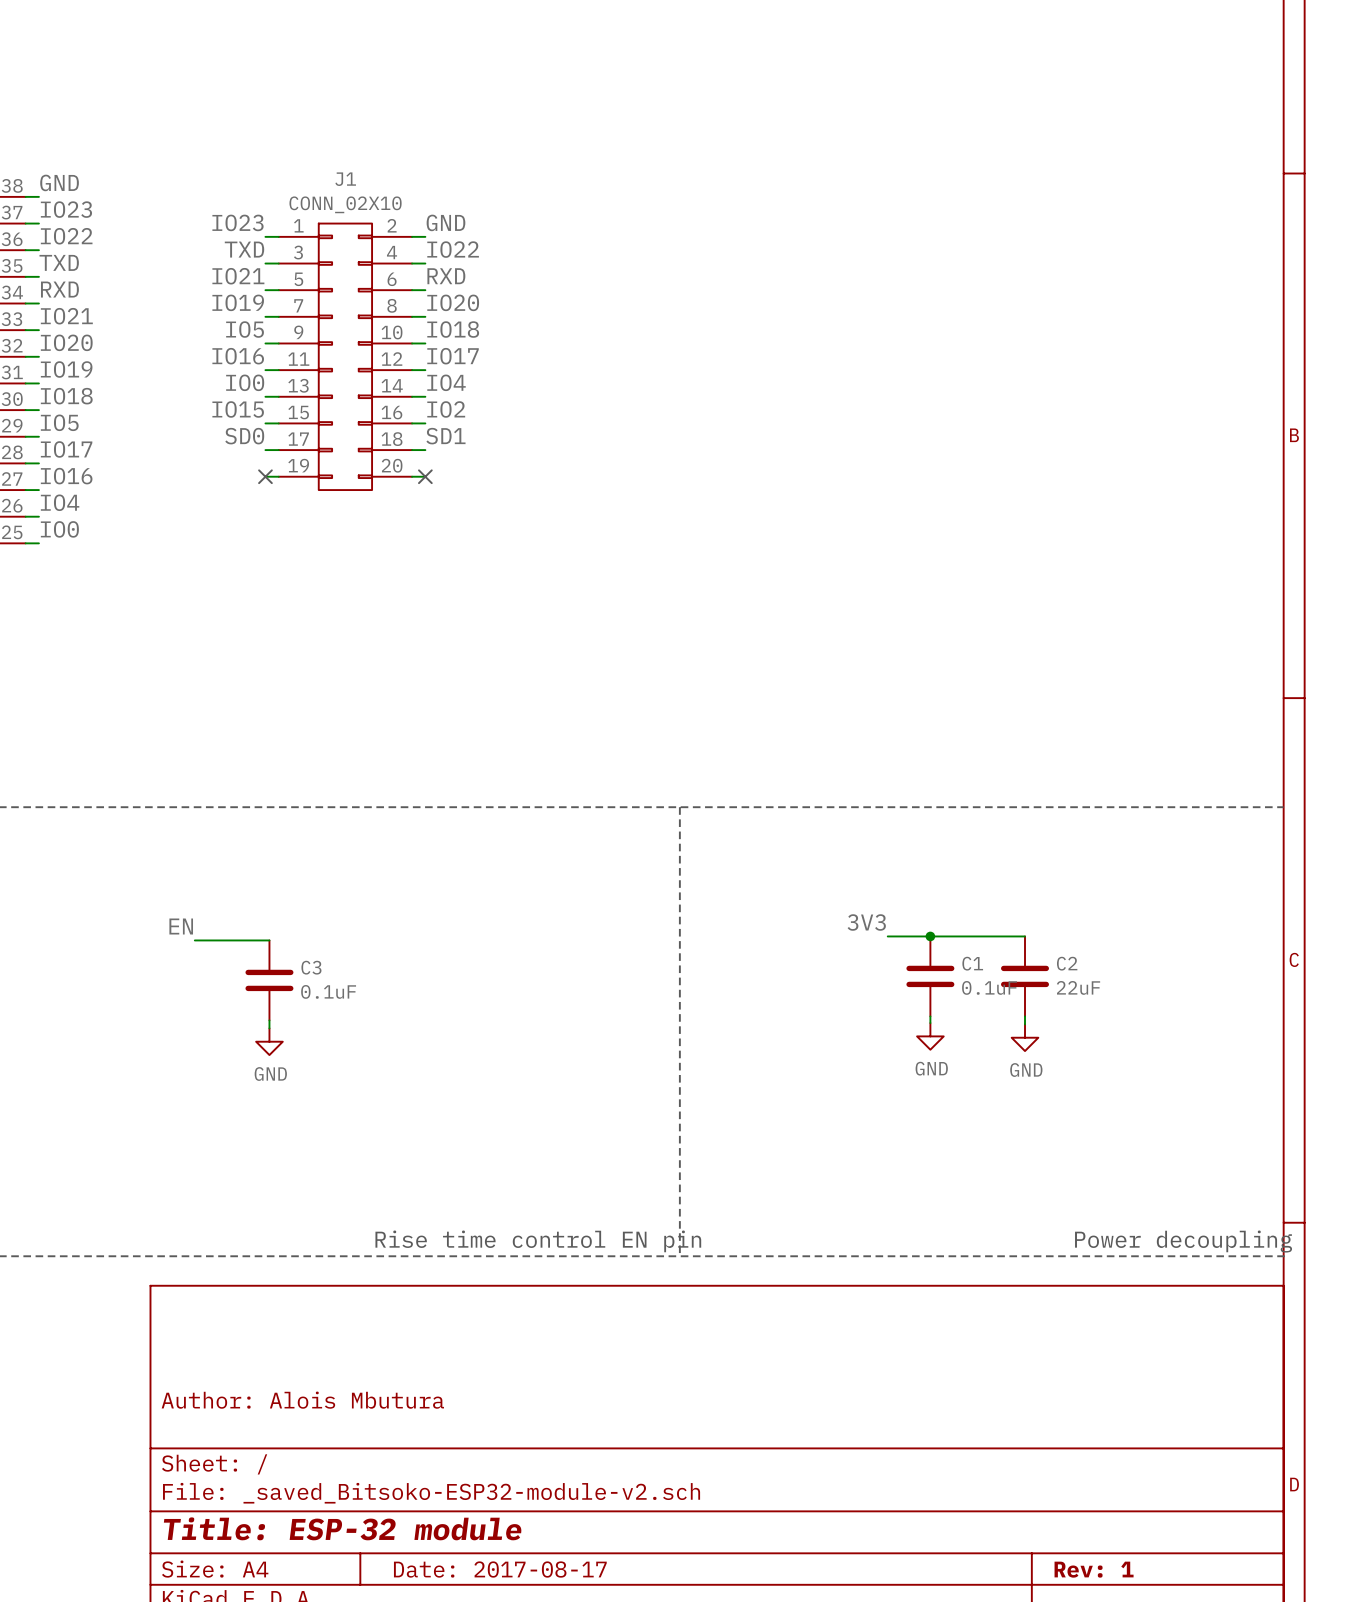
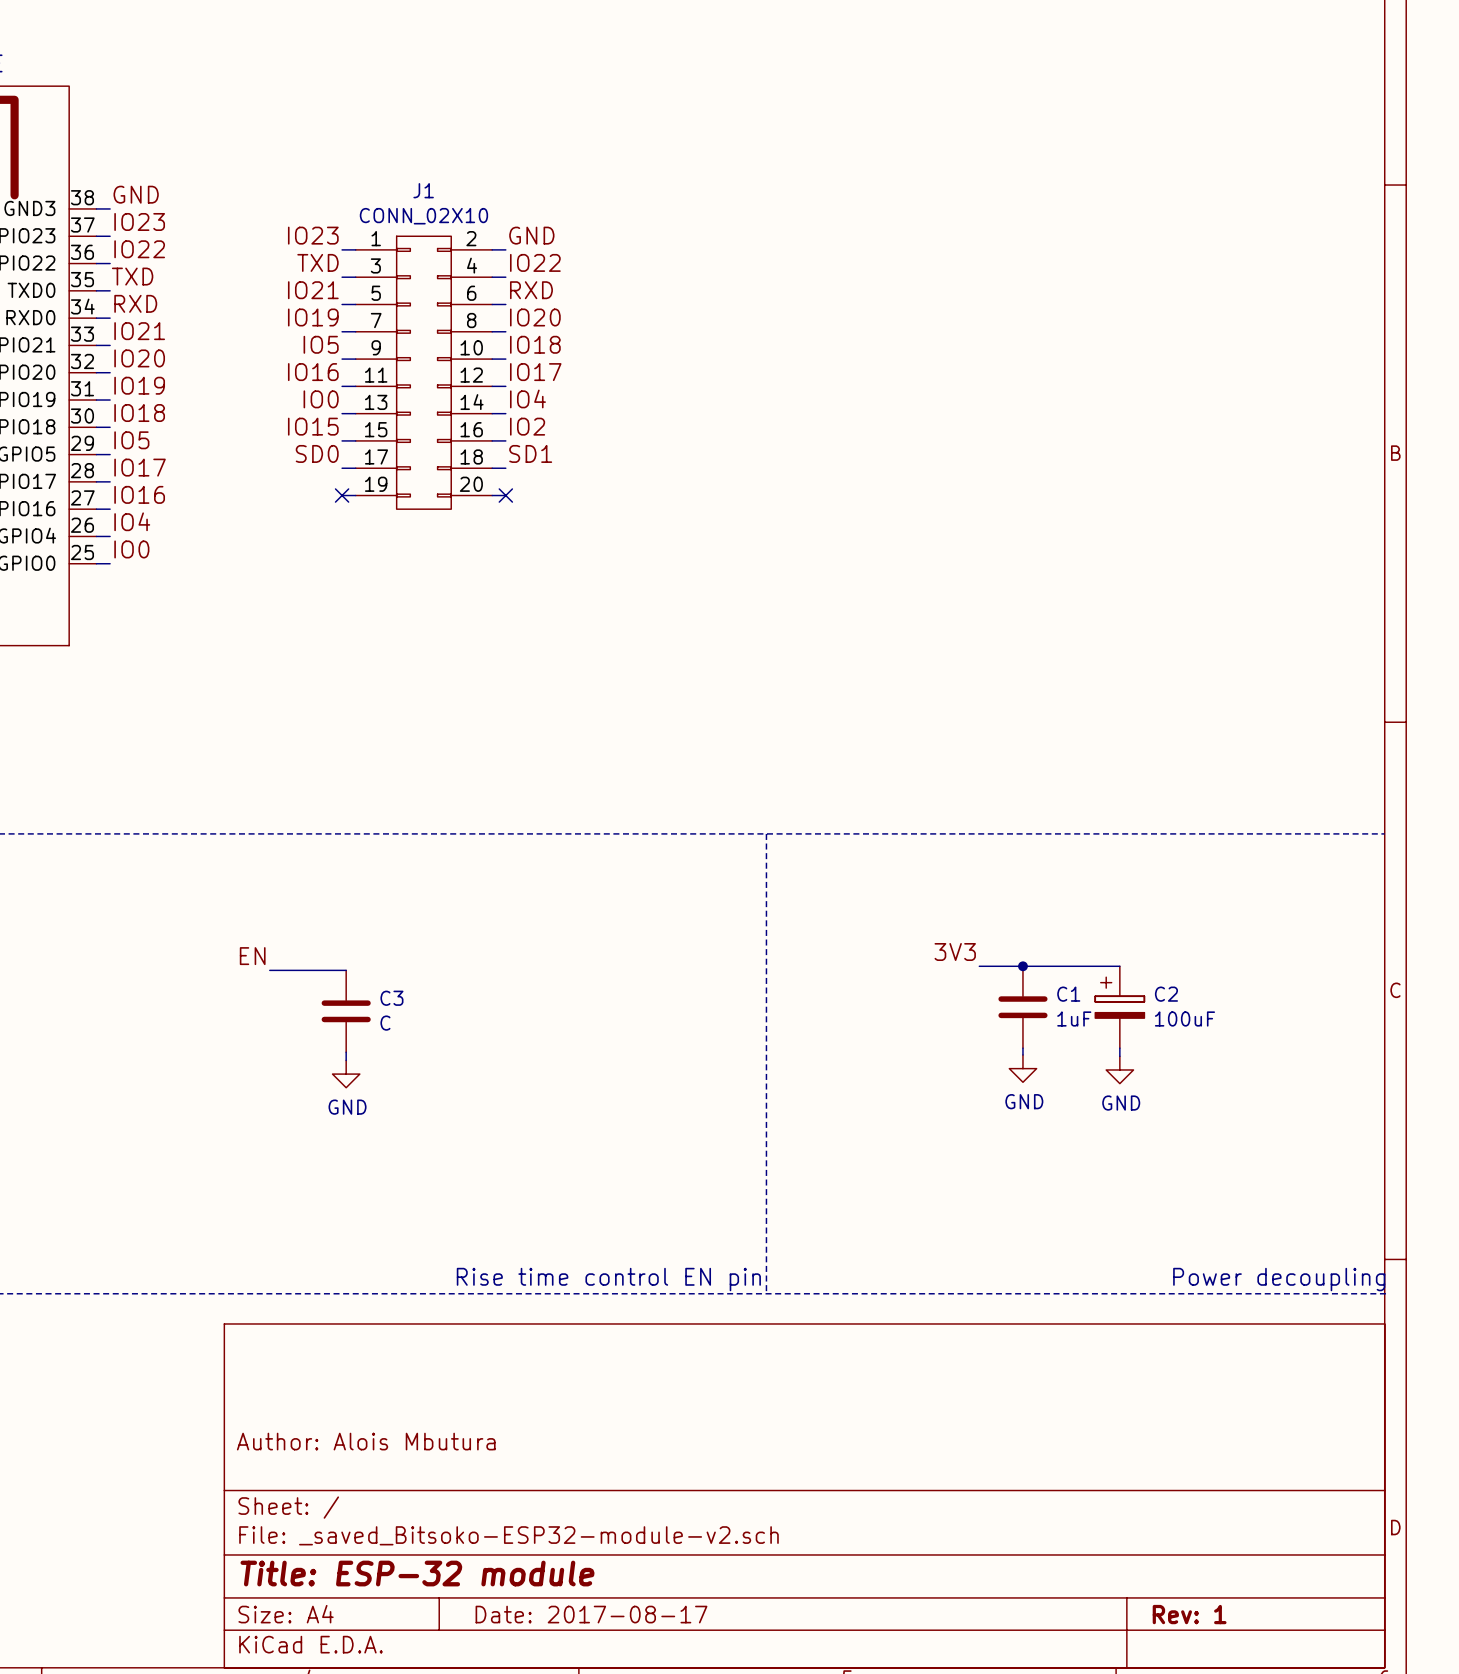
C2 symbol: [1001, 936, 1049, 1017] -> [1095, 966, 1145, 1049]
C1 value: 0.1uF (989, 987) -> 1uF (1074, 1018)
C2 value: 22uF (1078, 987) -> 100uF (1184, 1018)
C3 value: 0.1uF (328, 991) -> C (385, 1023)

